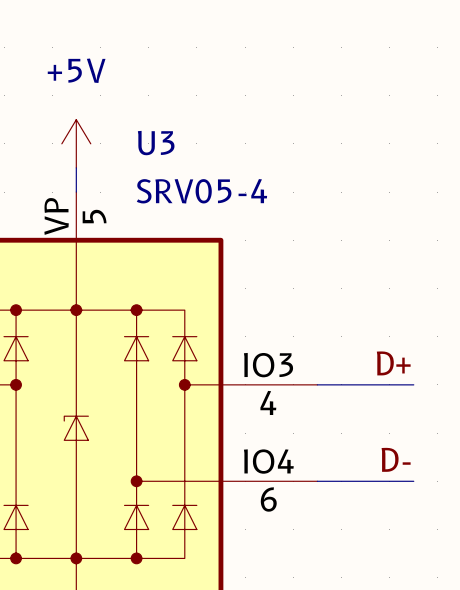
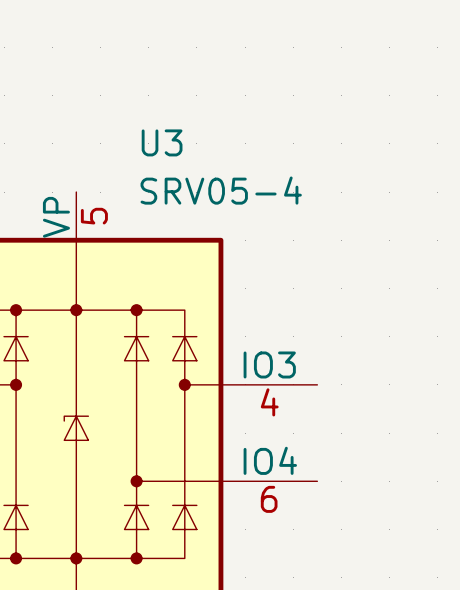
power symbol: +5V (76, 143) -> none
wire: (76, 167) (76, 192) -> none
label: D+ (393, 363) -> none
wire: (317, 384) (413, 384) -> none
label: D- (396, 459) -> none
wire: (317, 481) (413, 481) -> none

